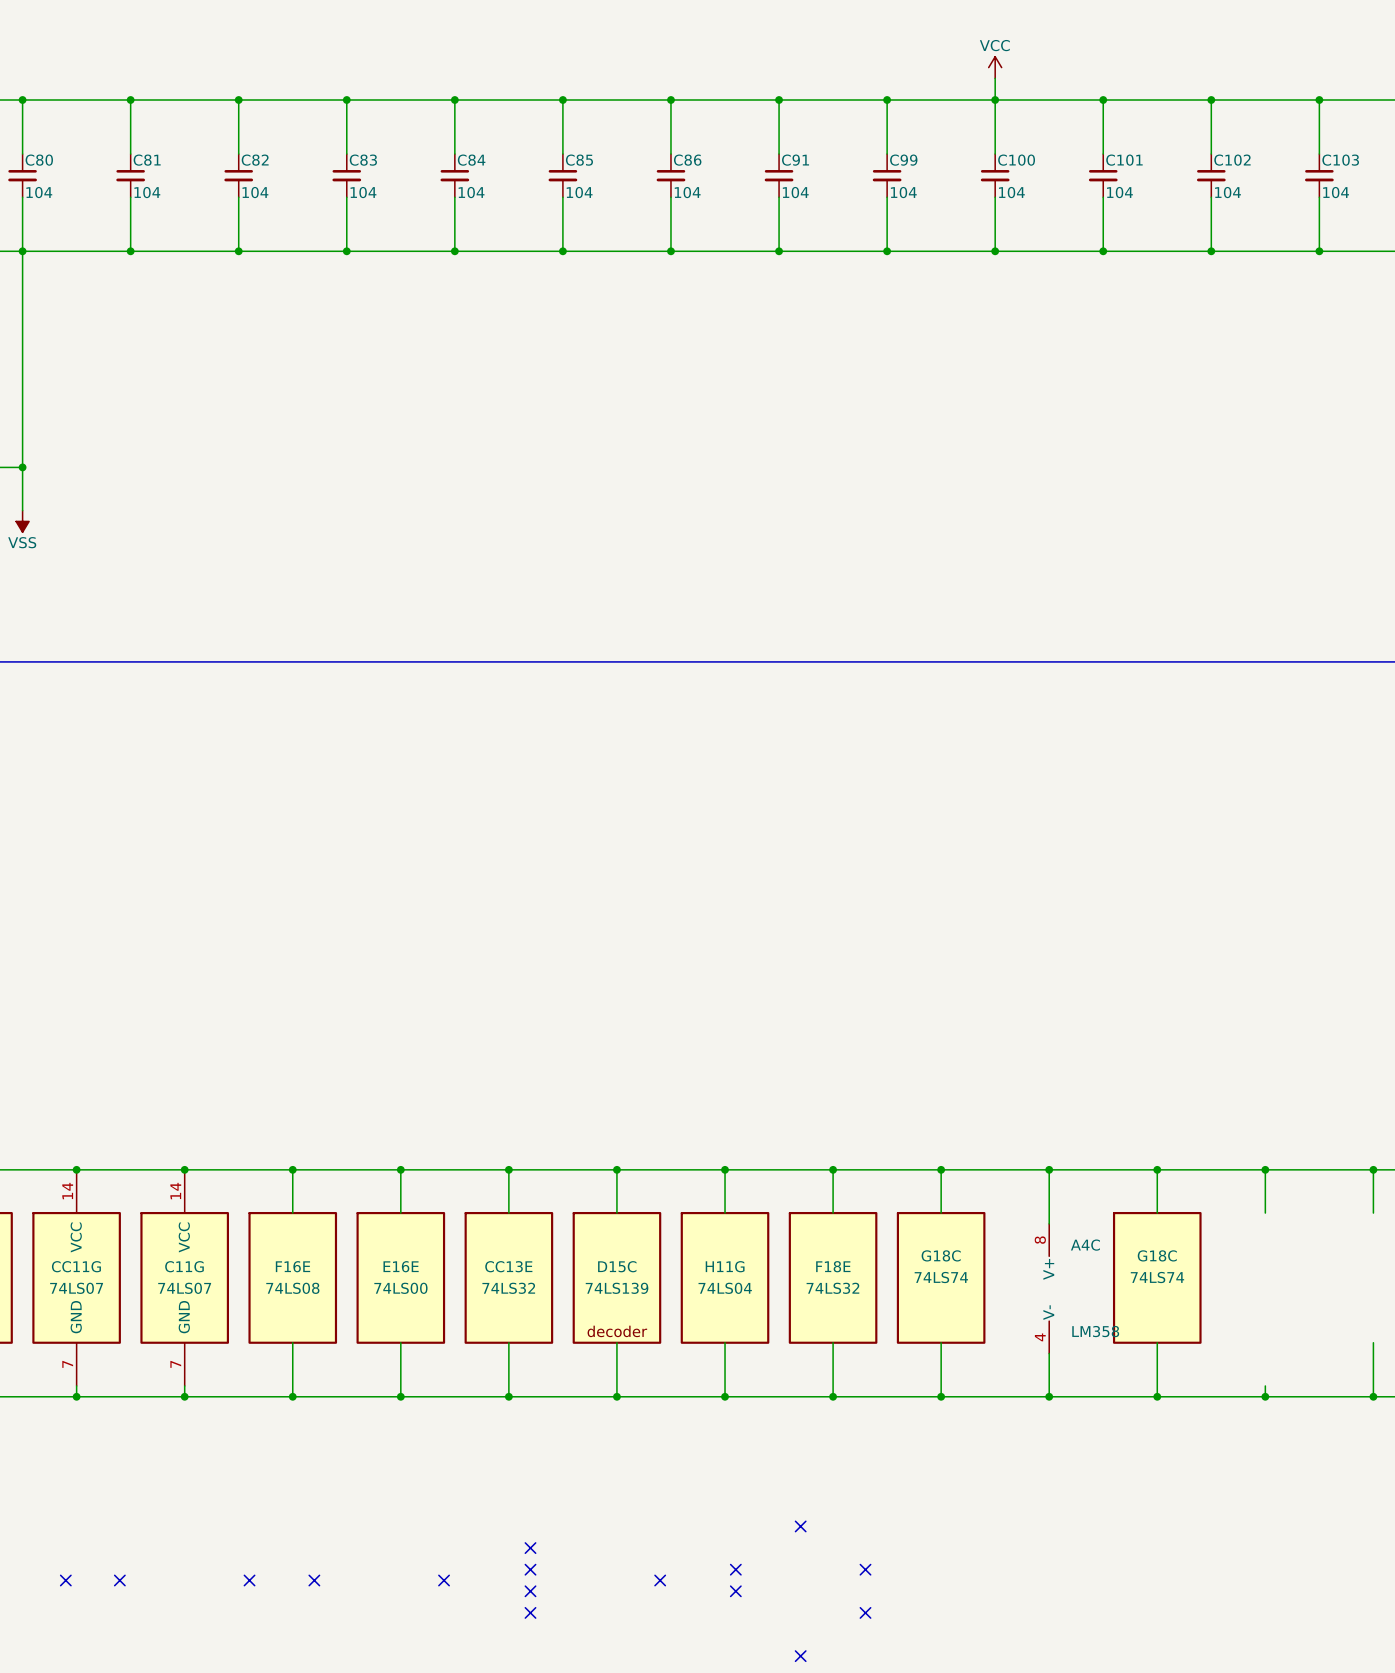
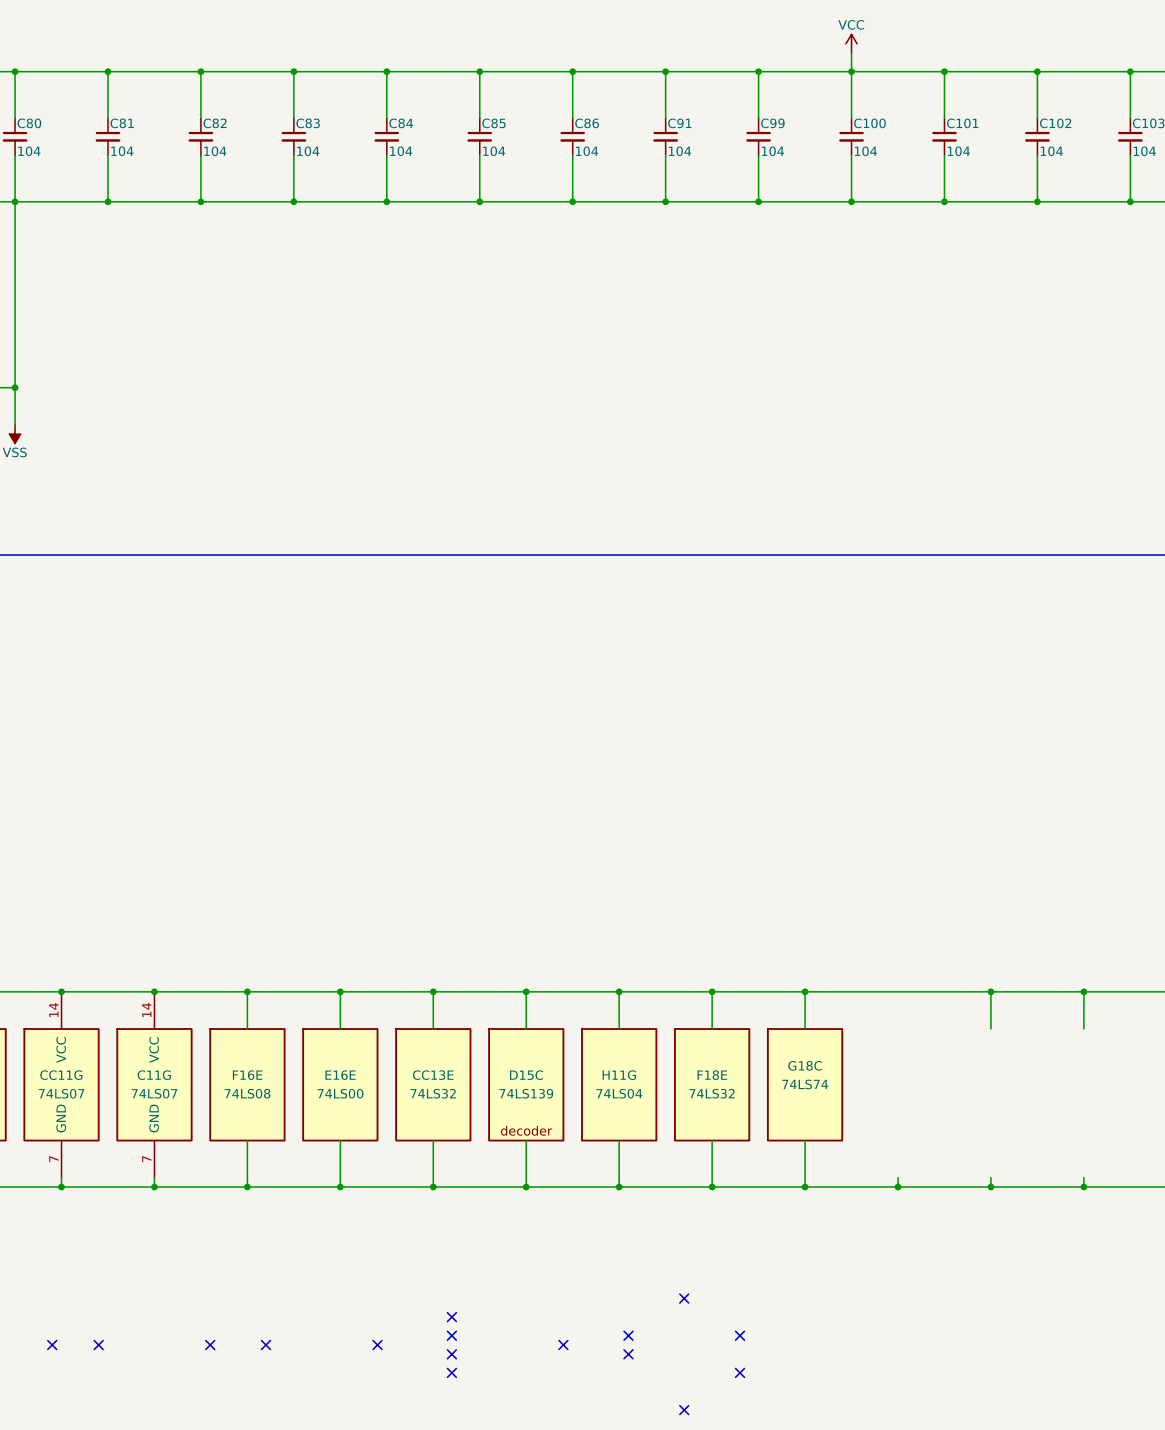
wire: (1049, 1169) (1049, 1223) -> none
junction: (1049, 1169) -> none
G18C: 74LS74 (1157, 1277) -> none
A4C: LM358 (1049, 1288) -> none
wire: (1157, 1342) (1157, 1385) -> none
wire: (1049, 1353) (1049, 1385) -> none

